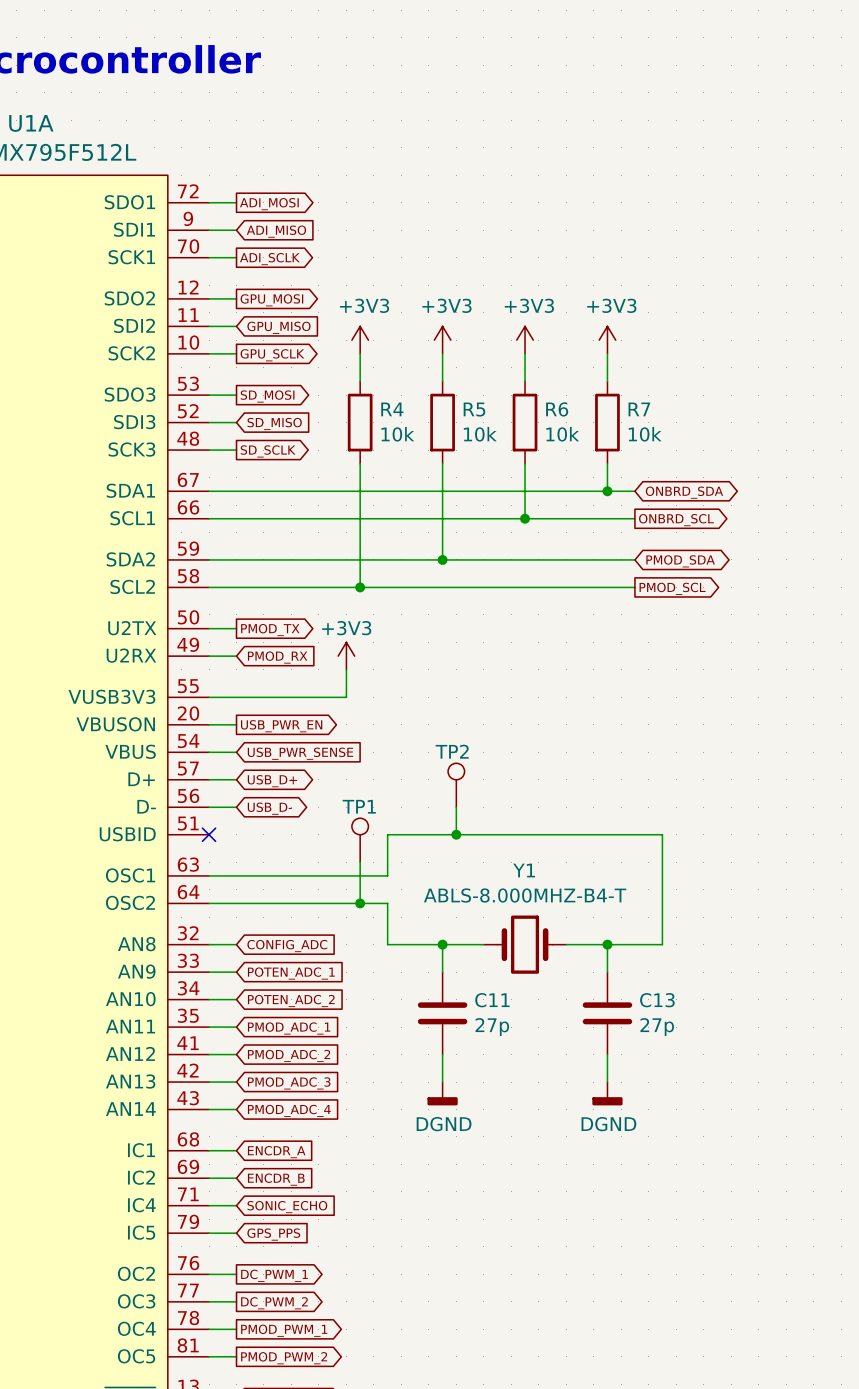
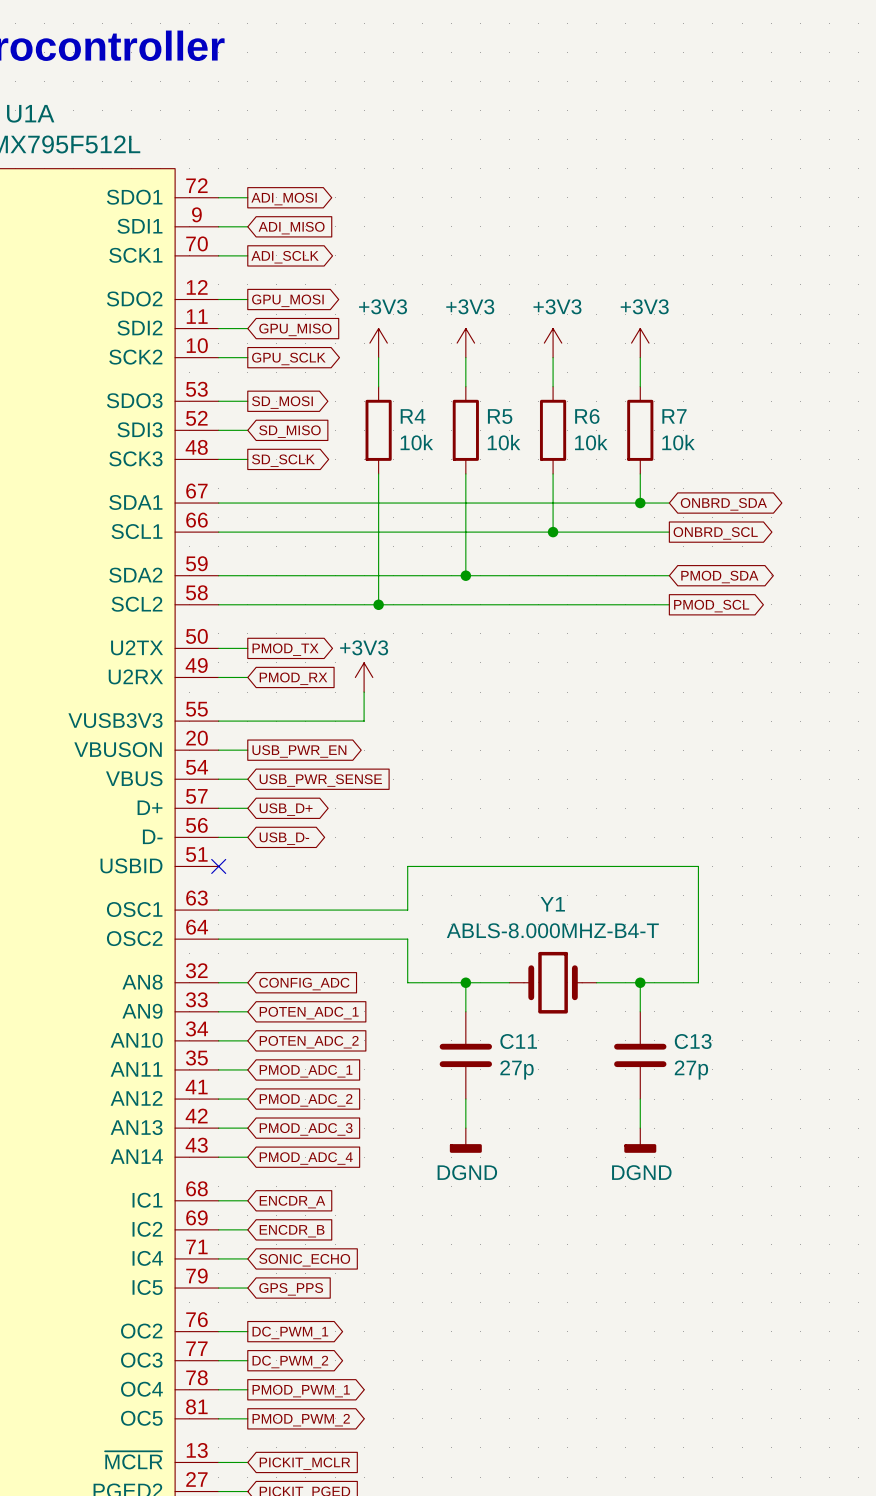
TP2: (456, 785) -> none
wire: (456, 807) (456, 834) -> none
junction: (456, 834) -> none
TP1: (360, 840) -> none
wire: (360, 862) (360, 903) -> none
junction: (360, 903) -> none

